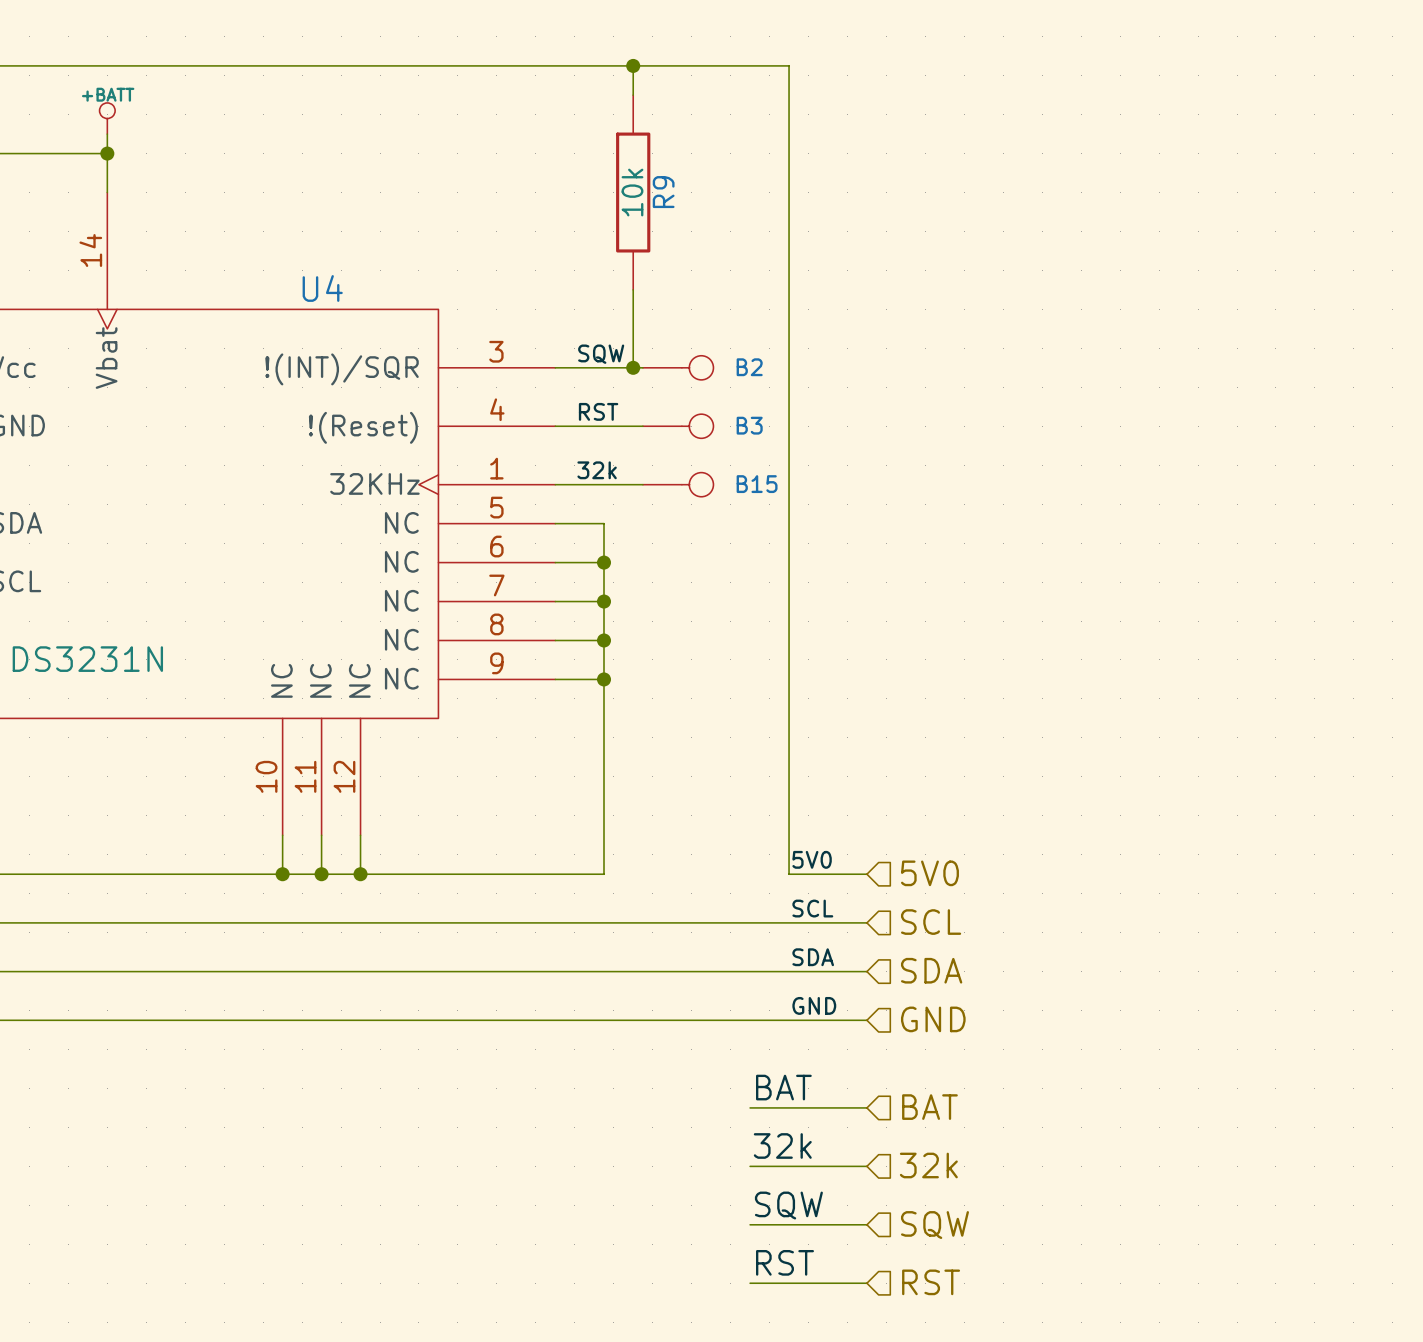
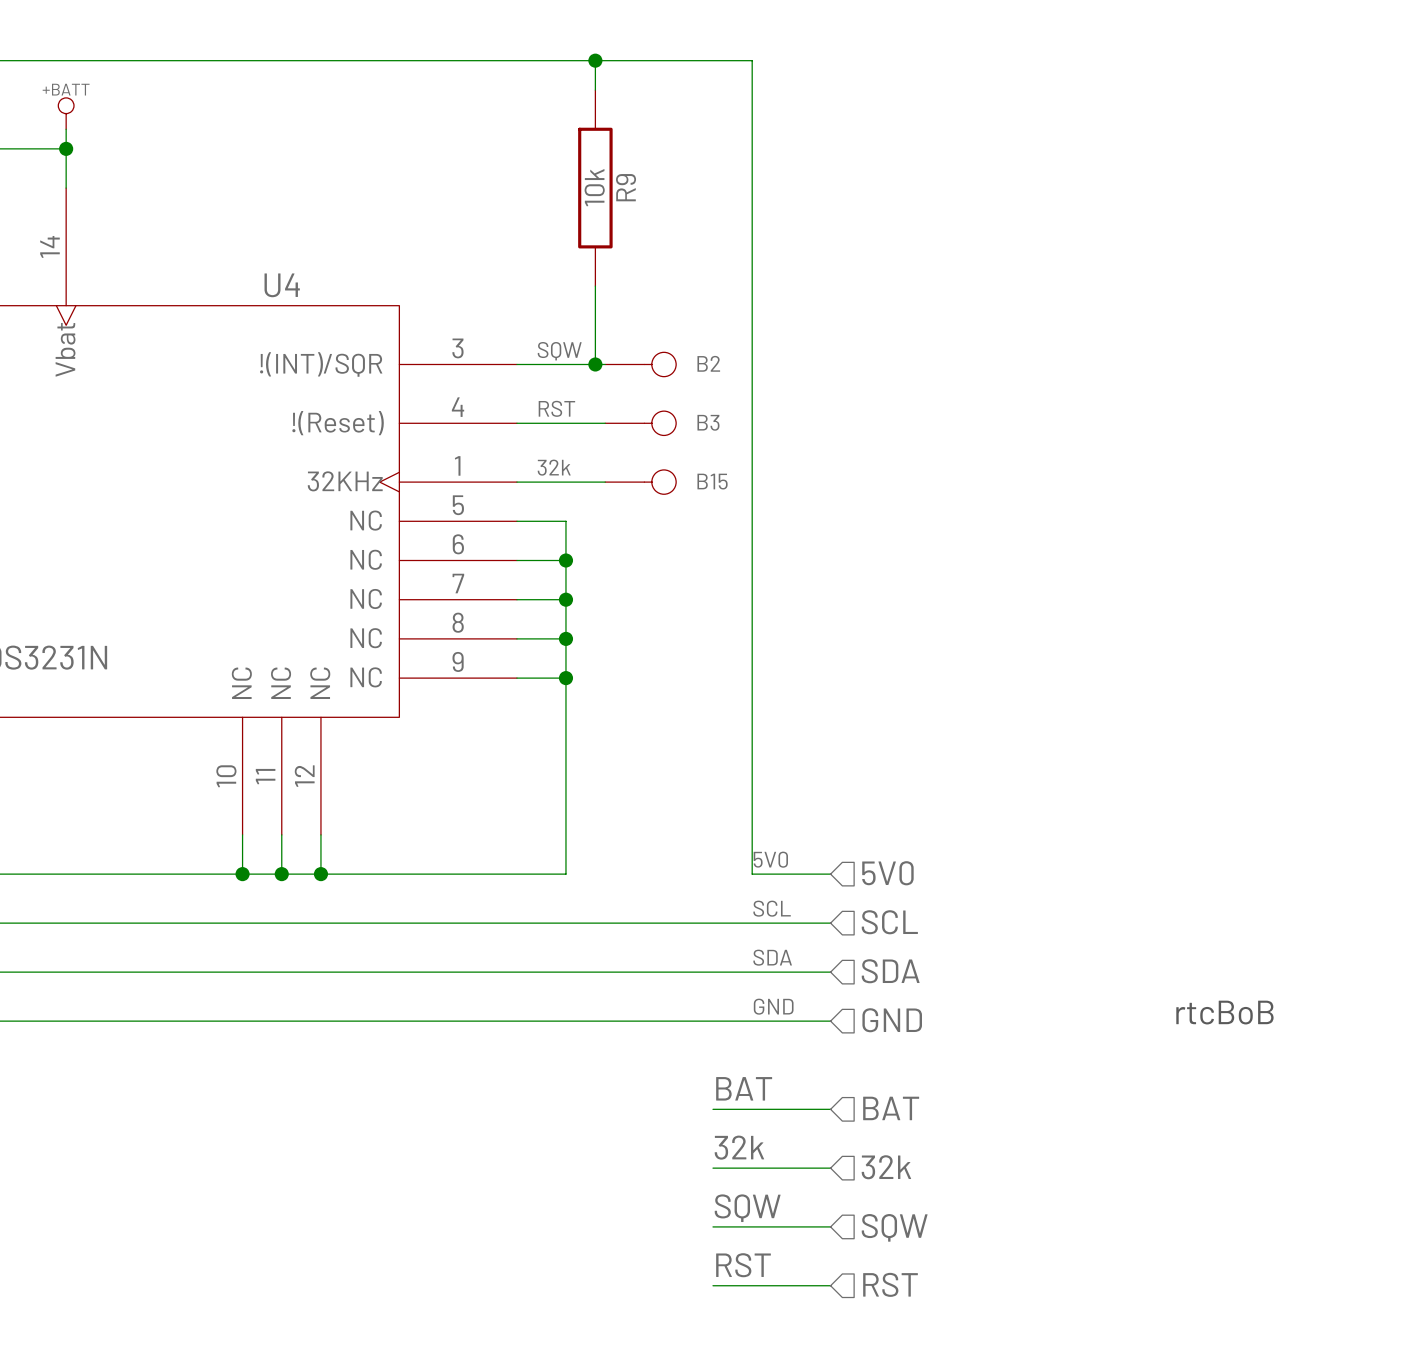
text: none -> rtcBoB (1224, 1012)

